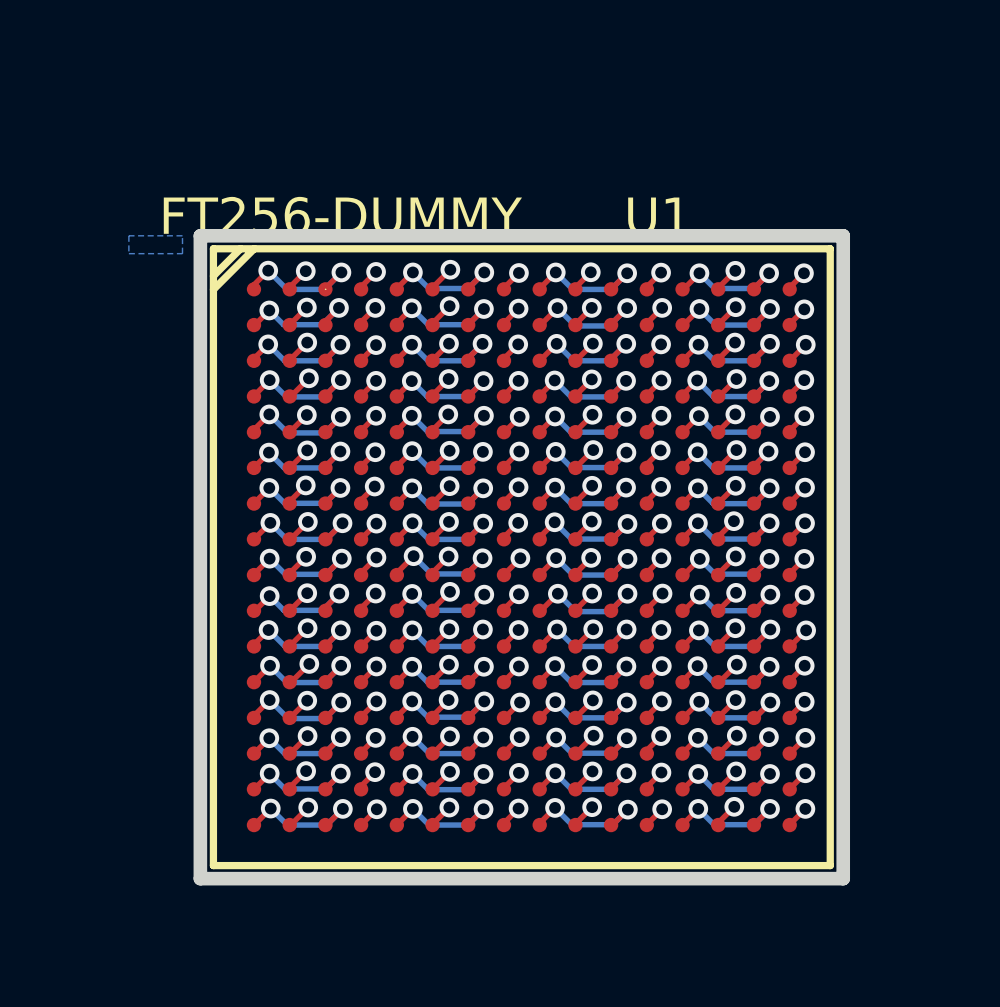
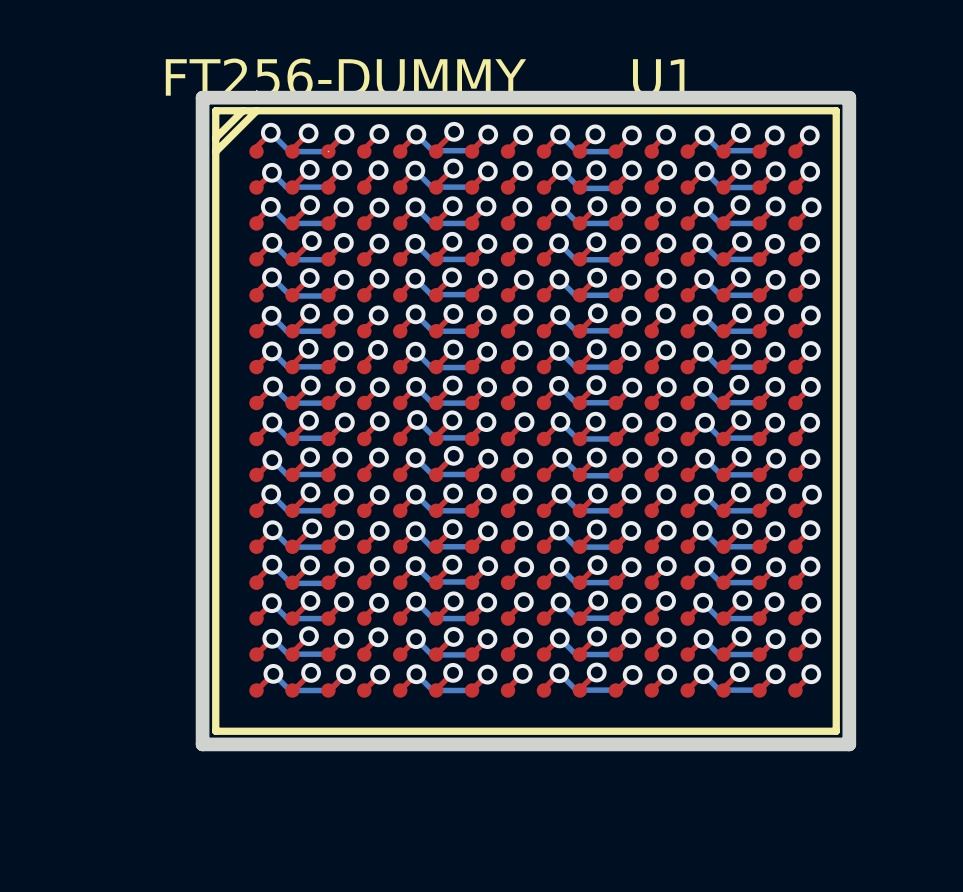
bottom zone outline: (128, 235) (182, 235) (182, 253) (128, 253) (128, 235) -> none

